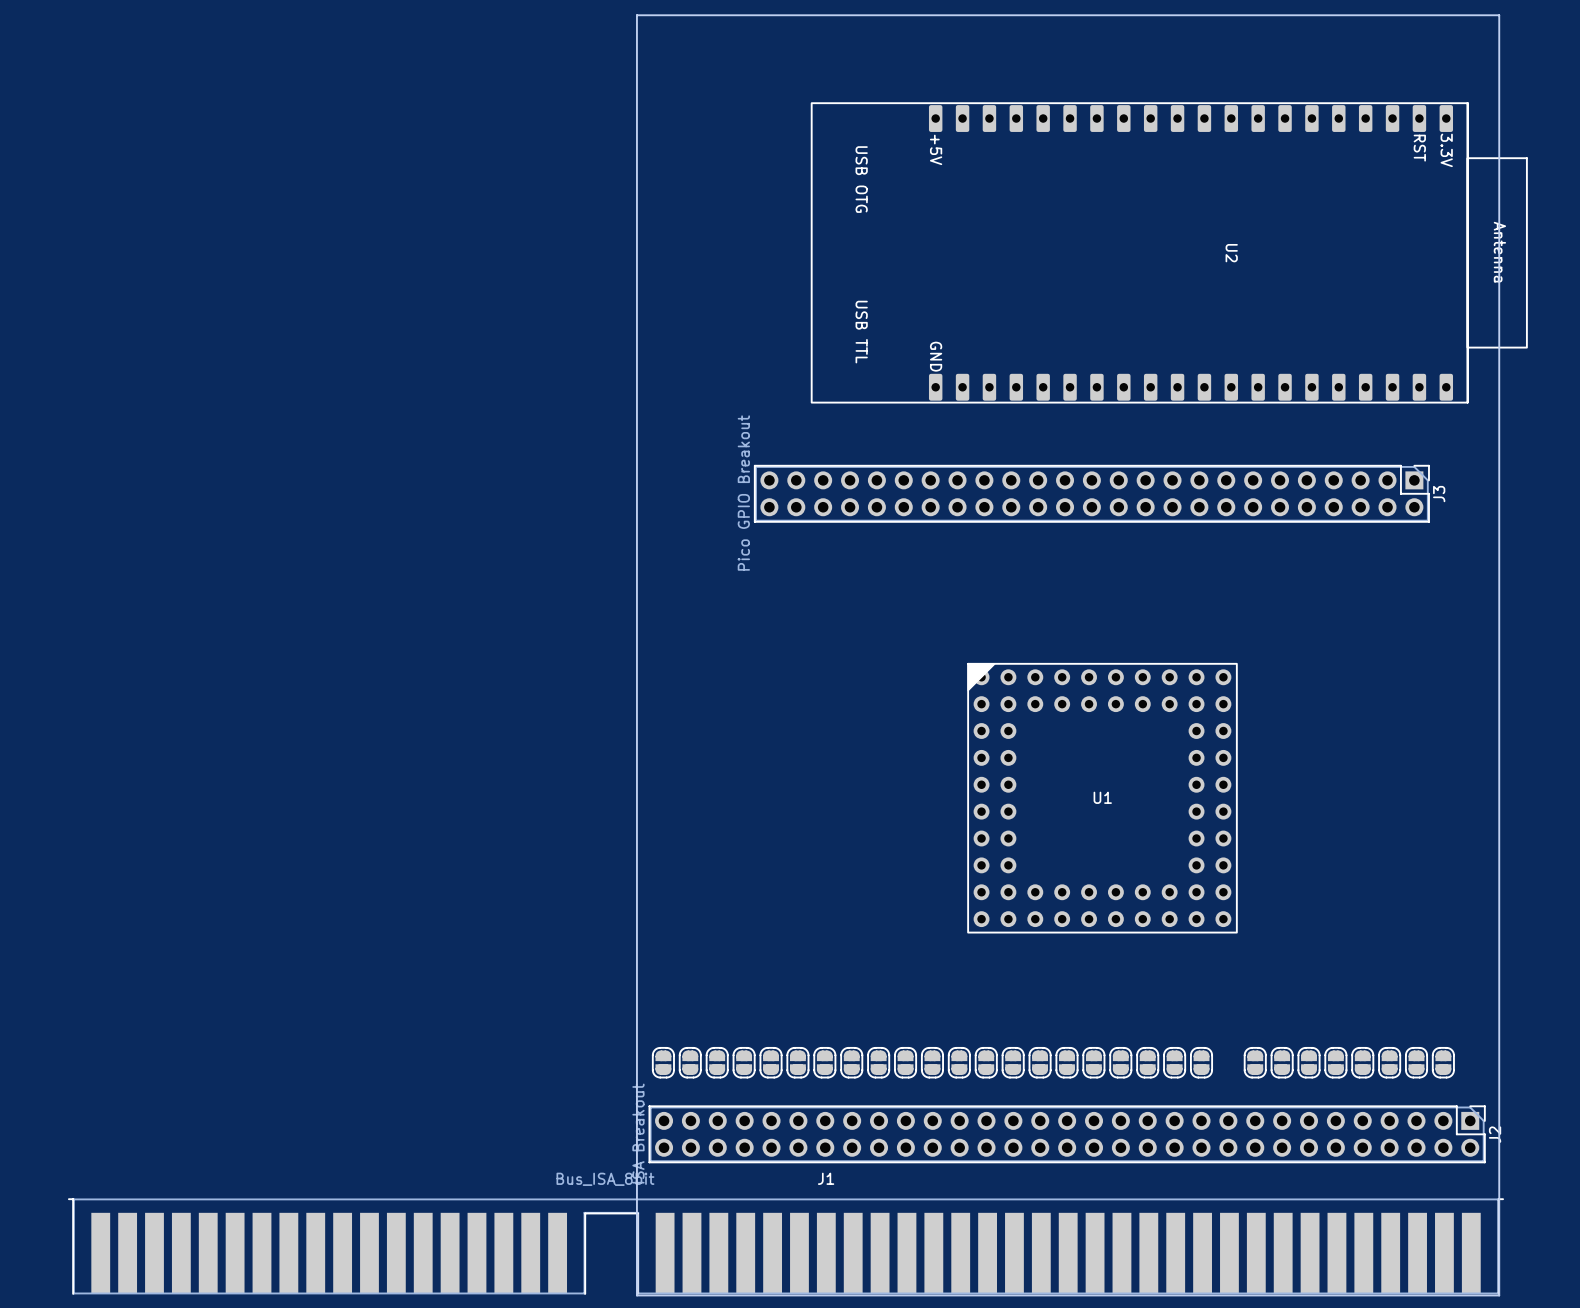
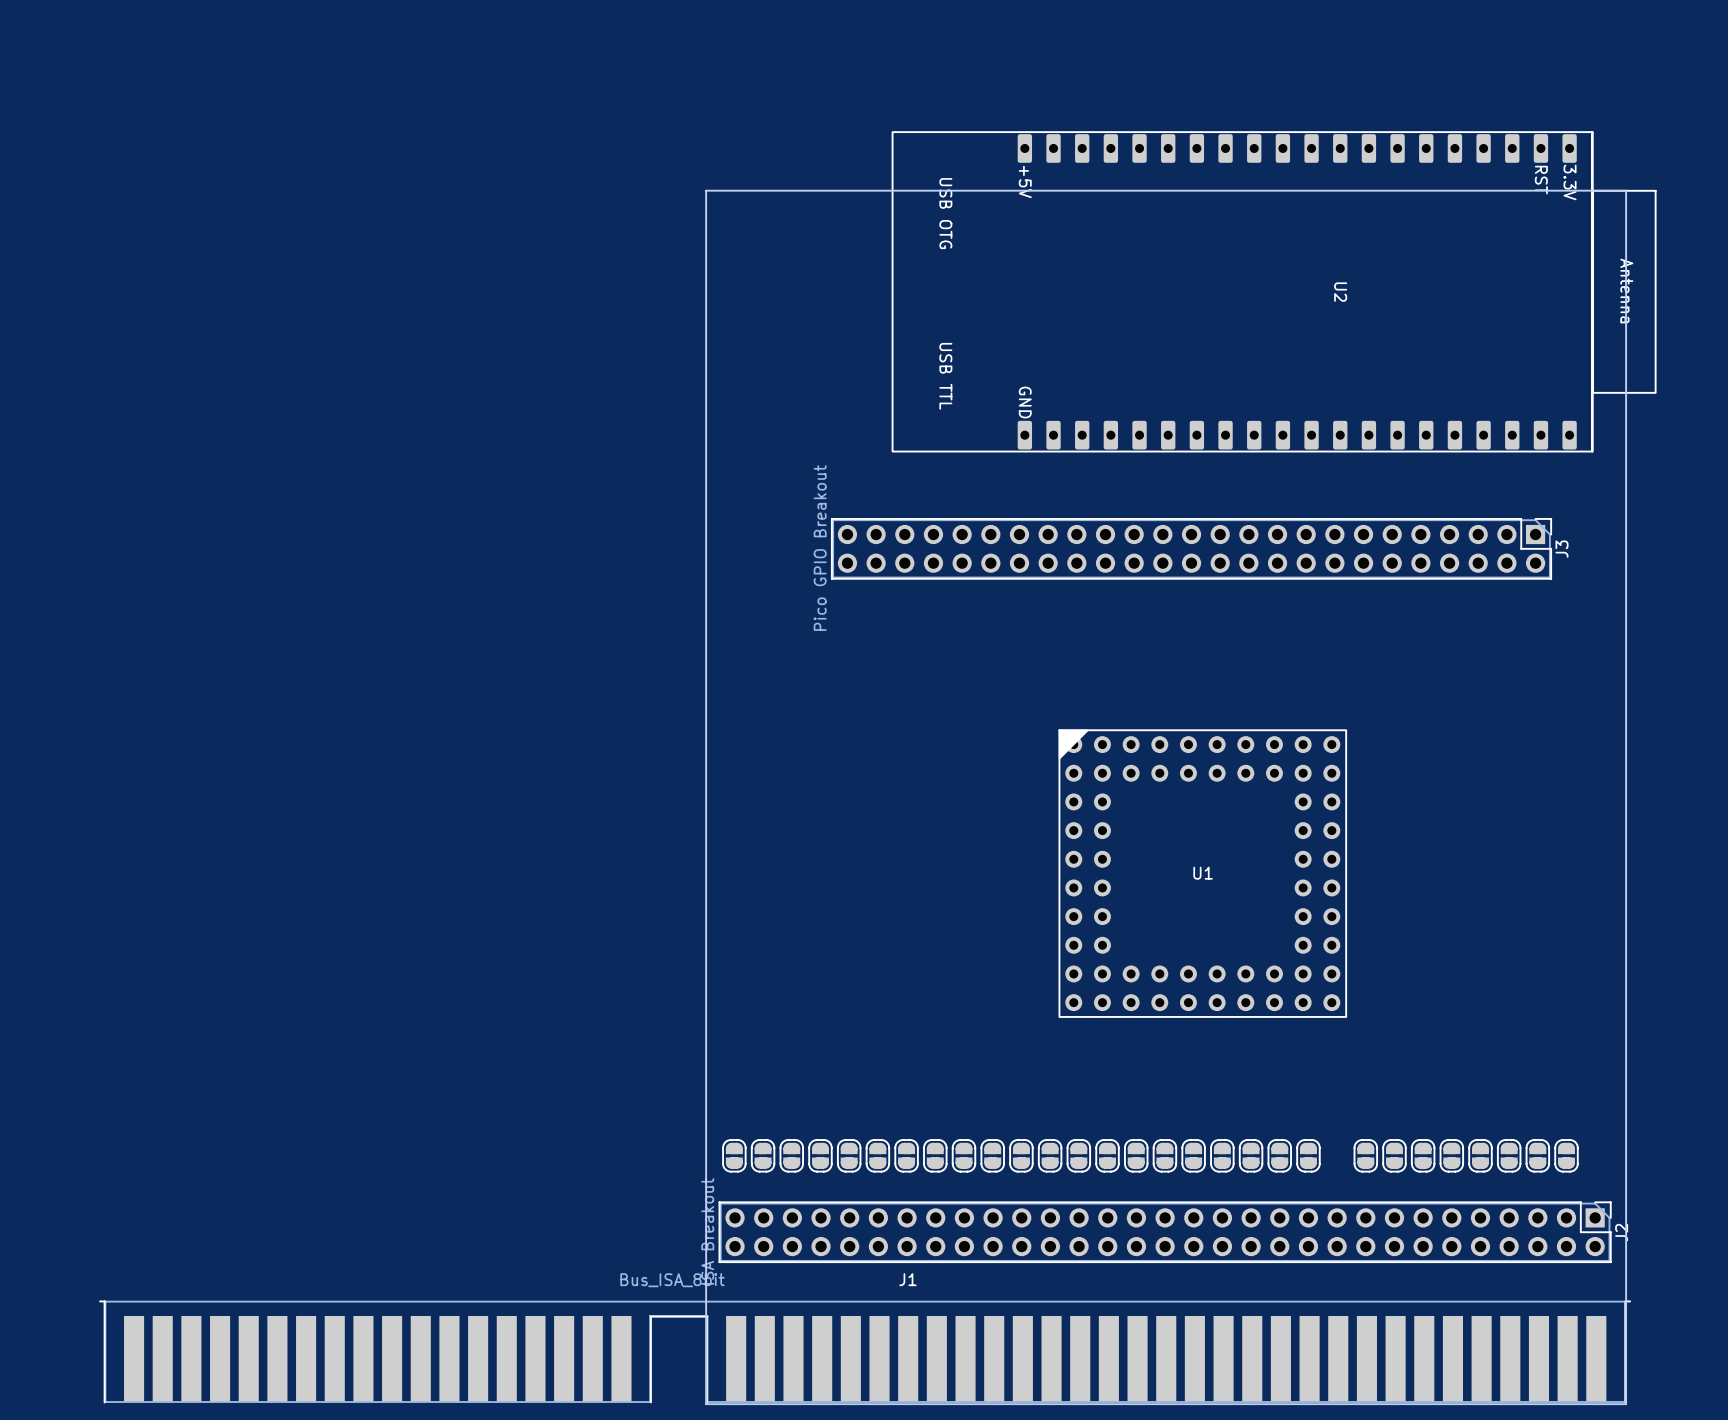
board edge: (636, 158) (636, 15) (1499, 15) (1499, 158) -> (706, 190) (1626, 190)

